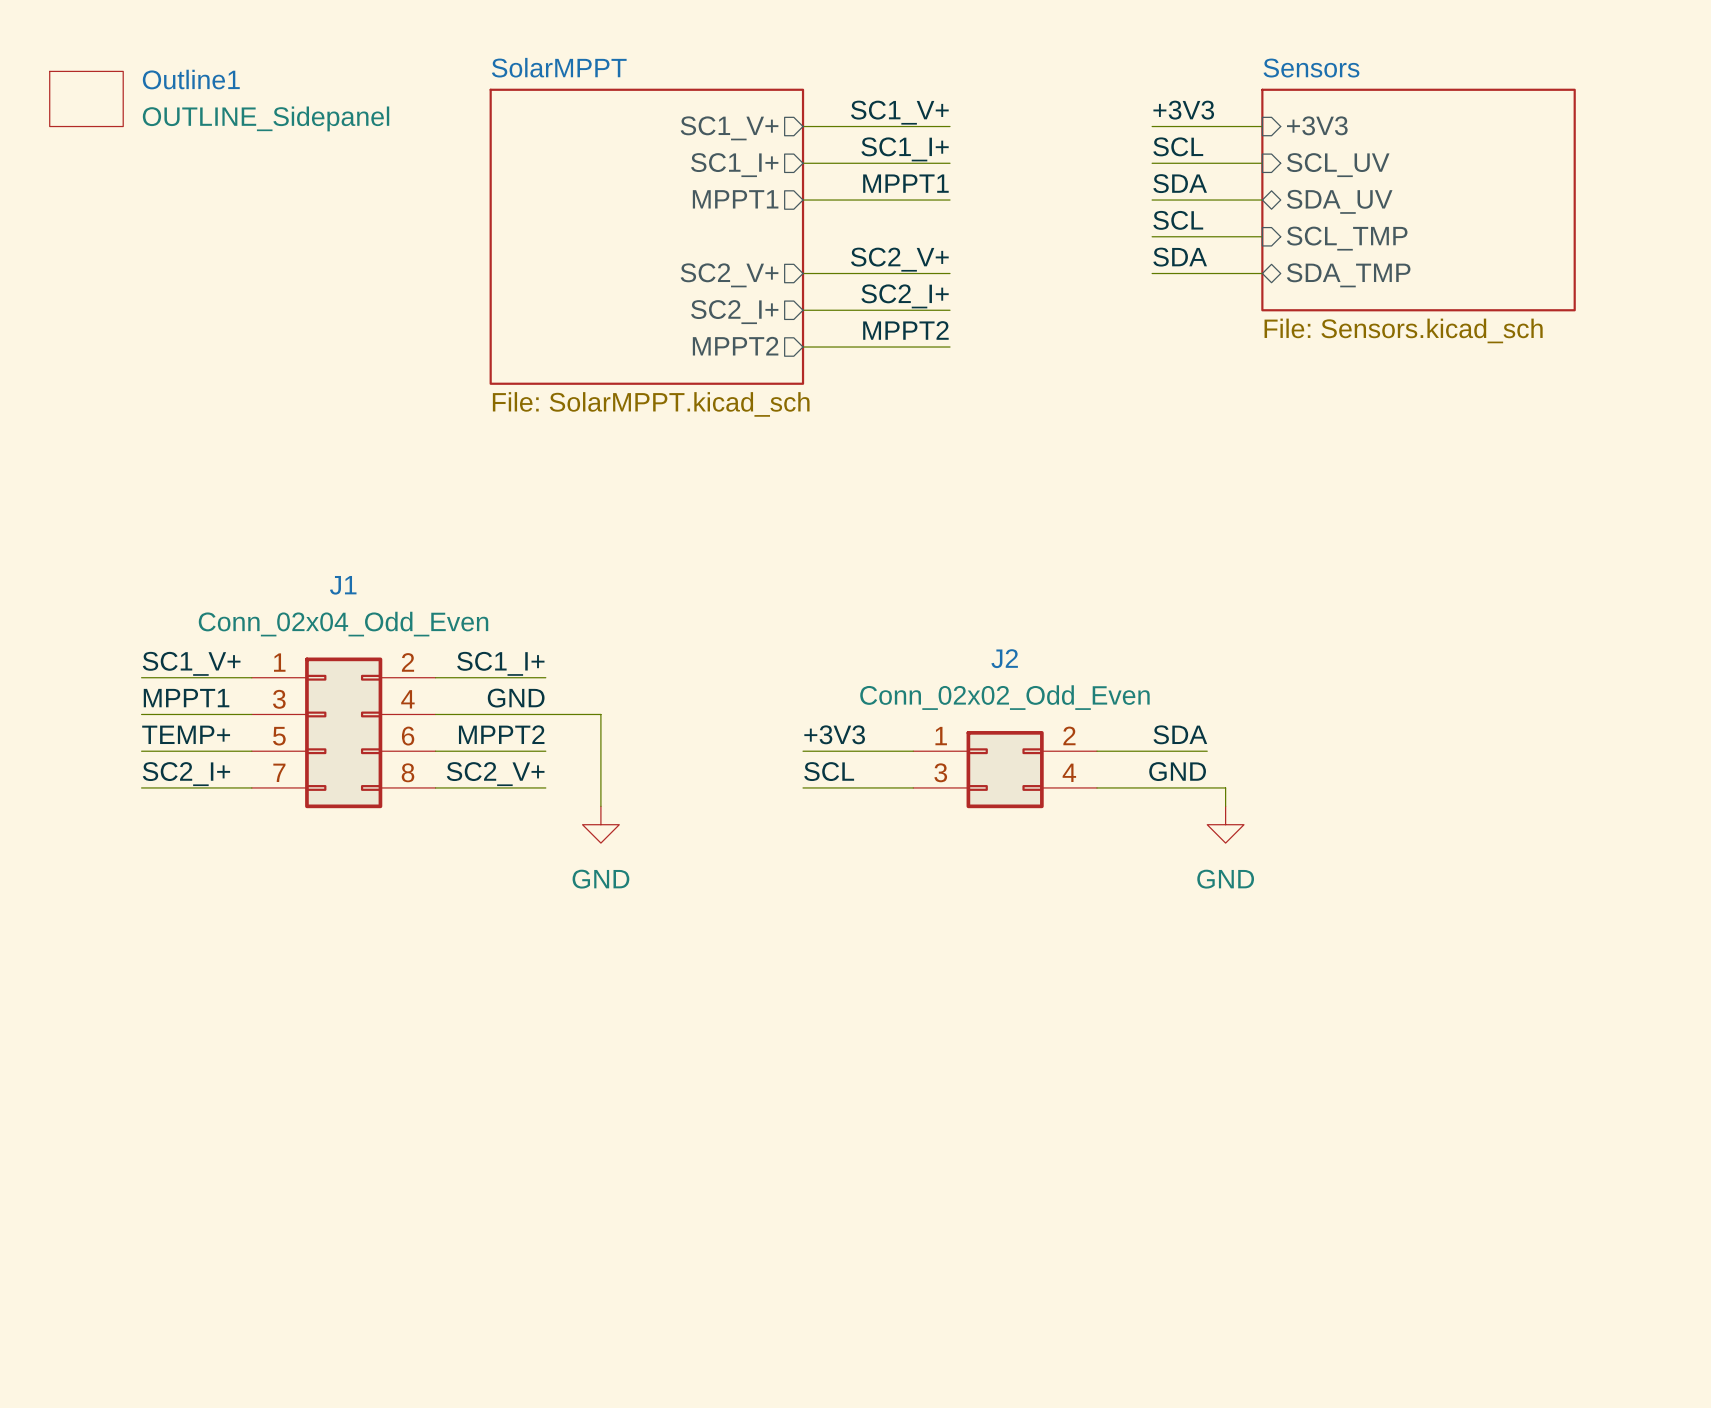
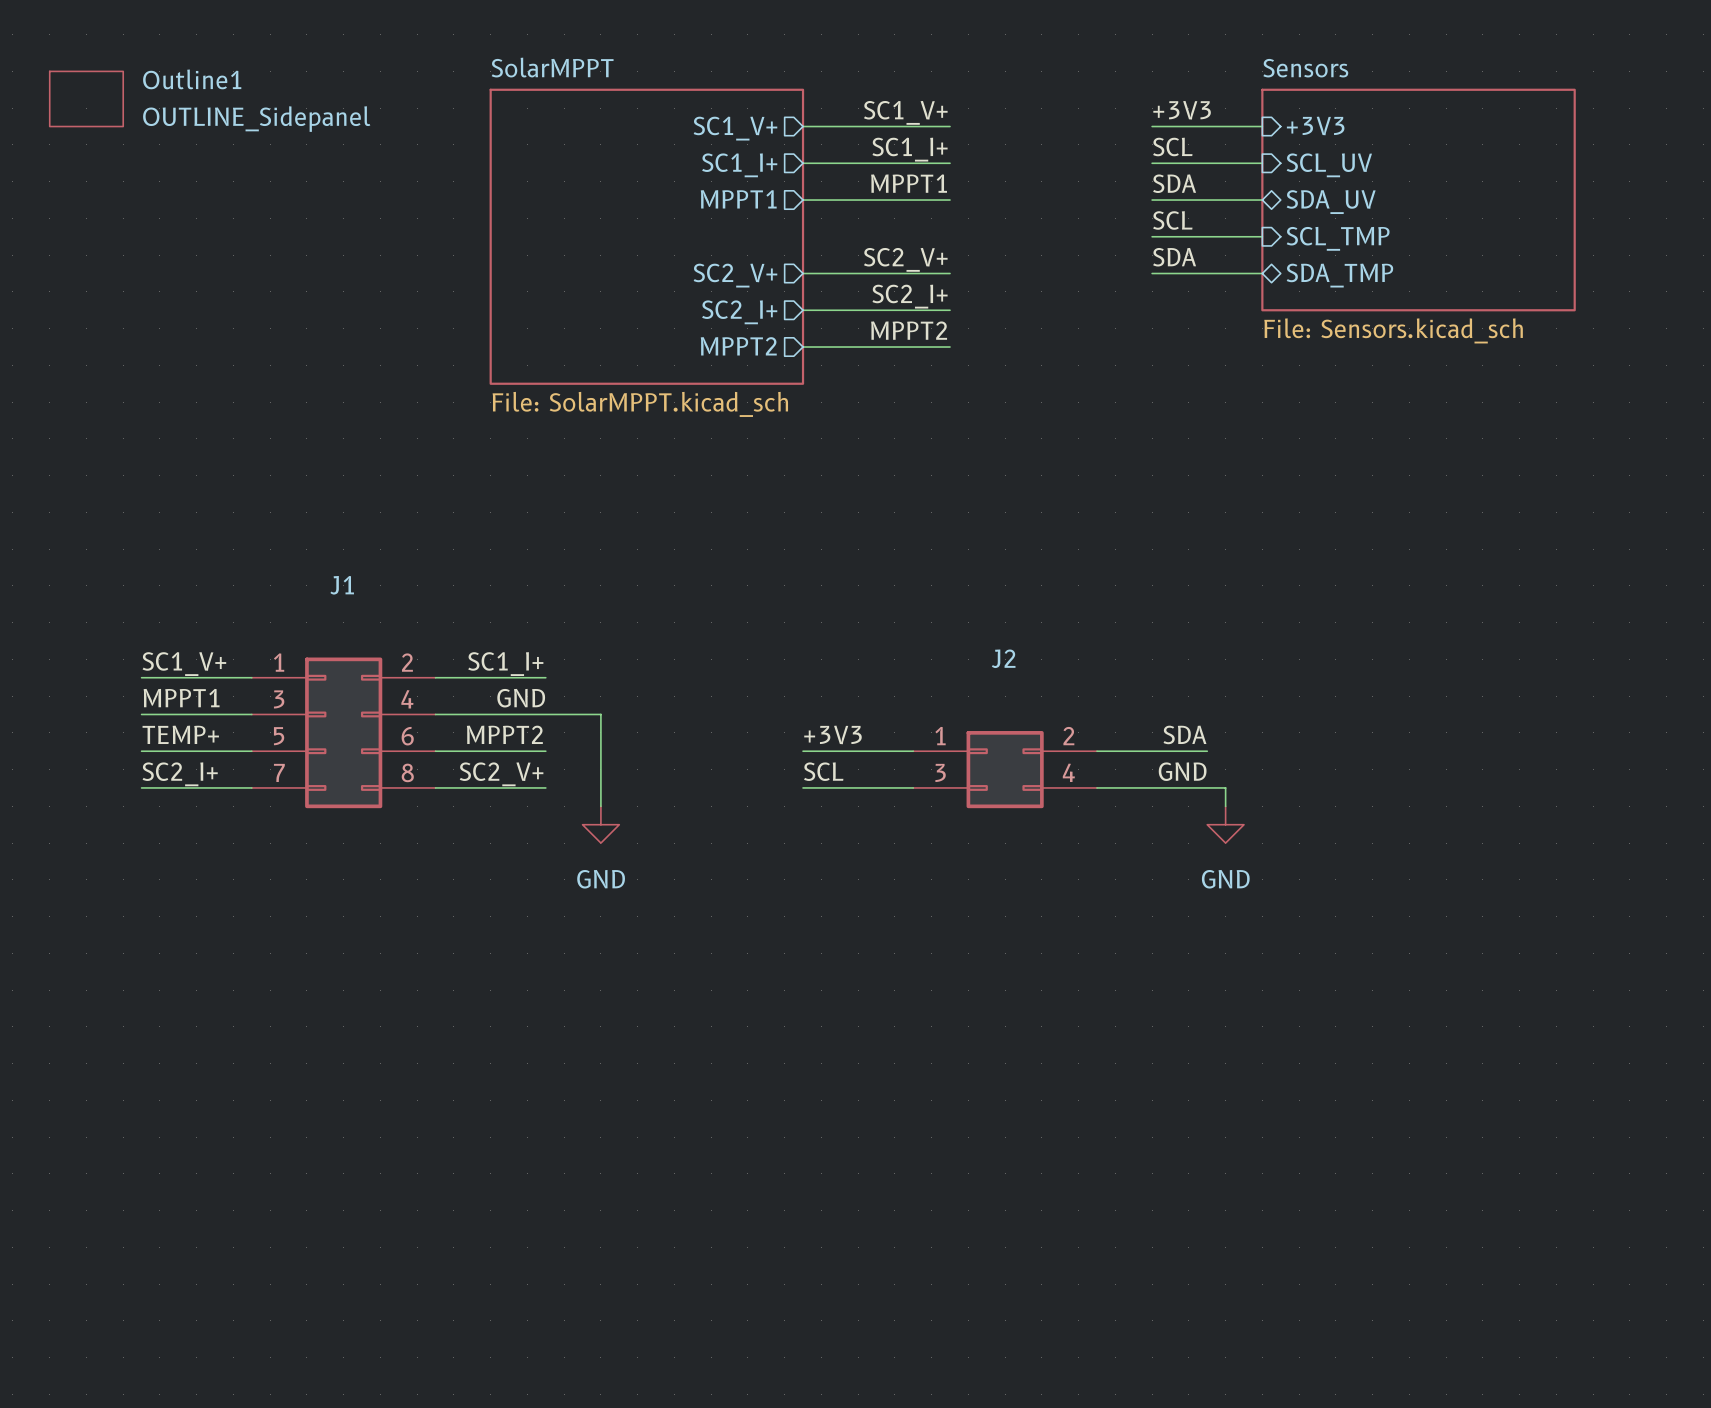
J1 value: Conn_02x04_Odd_Even (343, 624) -> none
J2 value: Conn_02x02_Odd_Even (1004, 697) -> none

